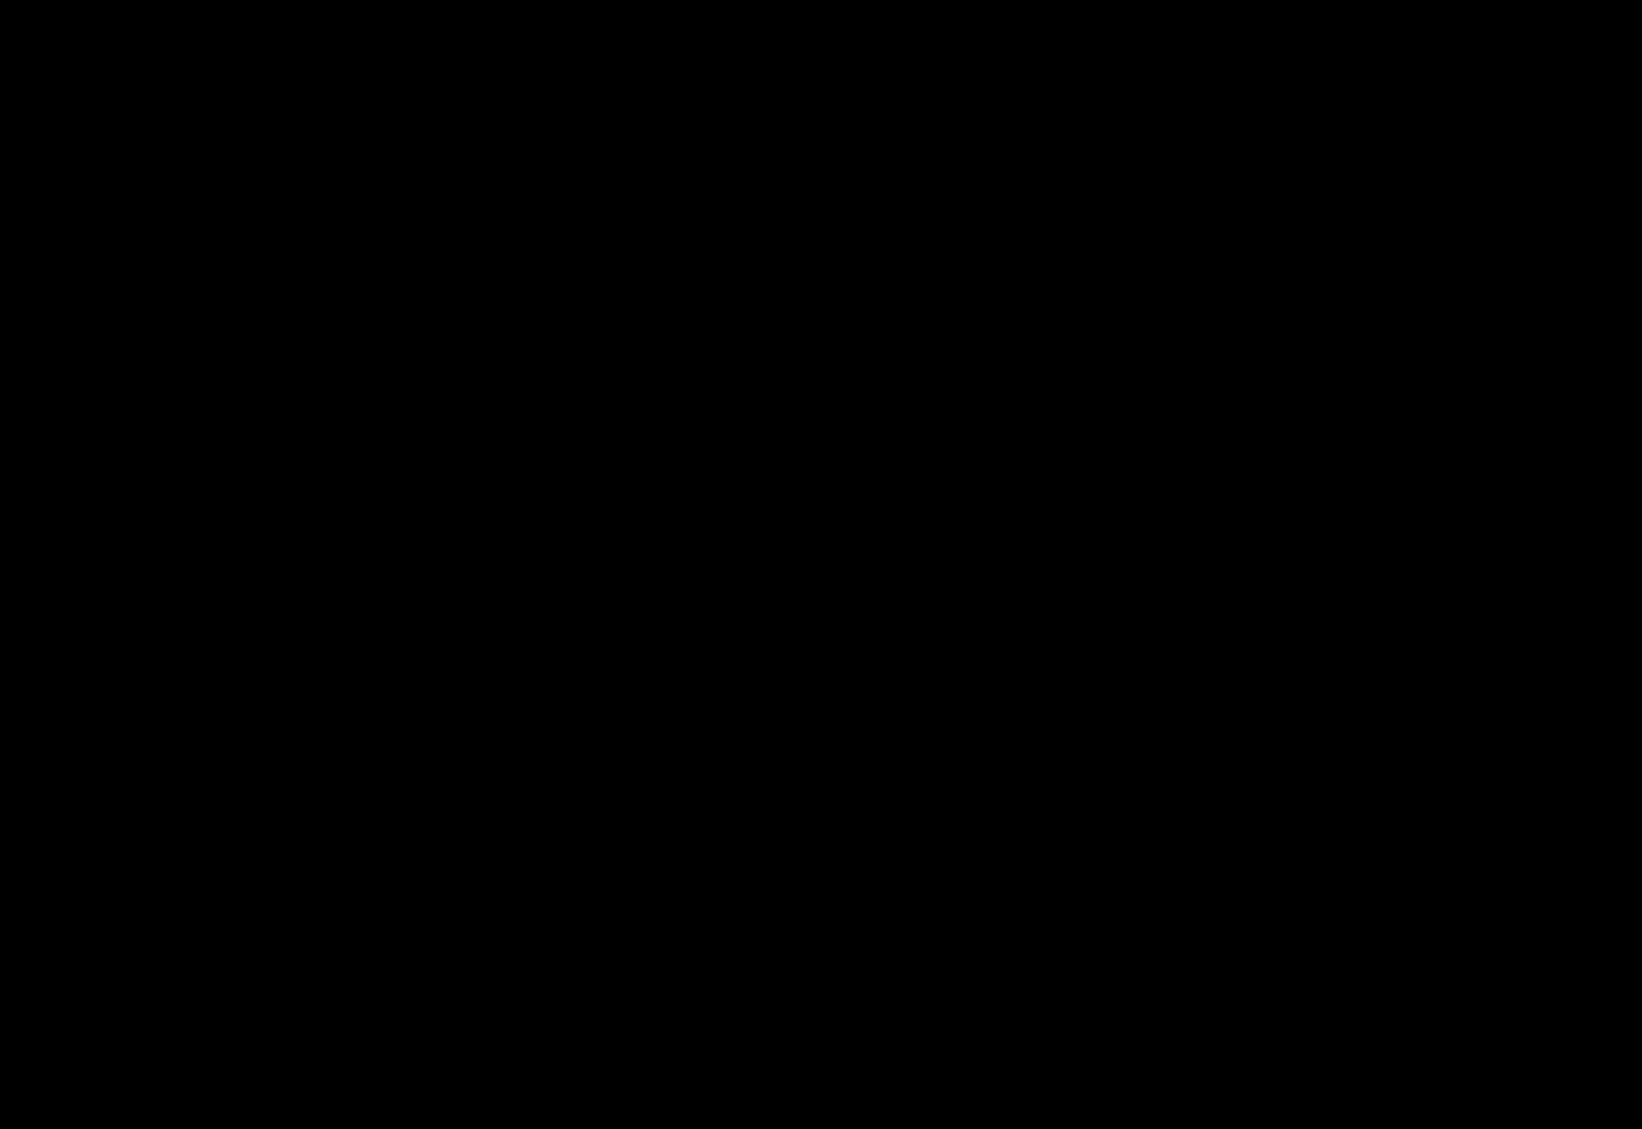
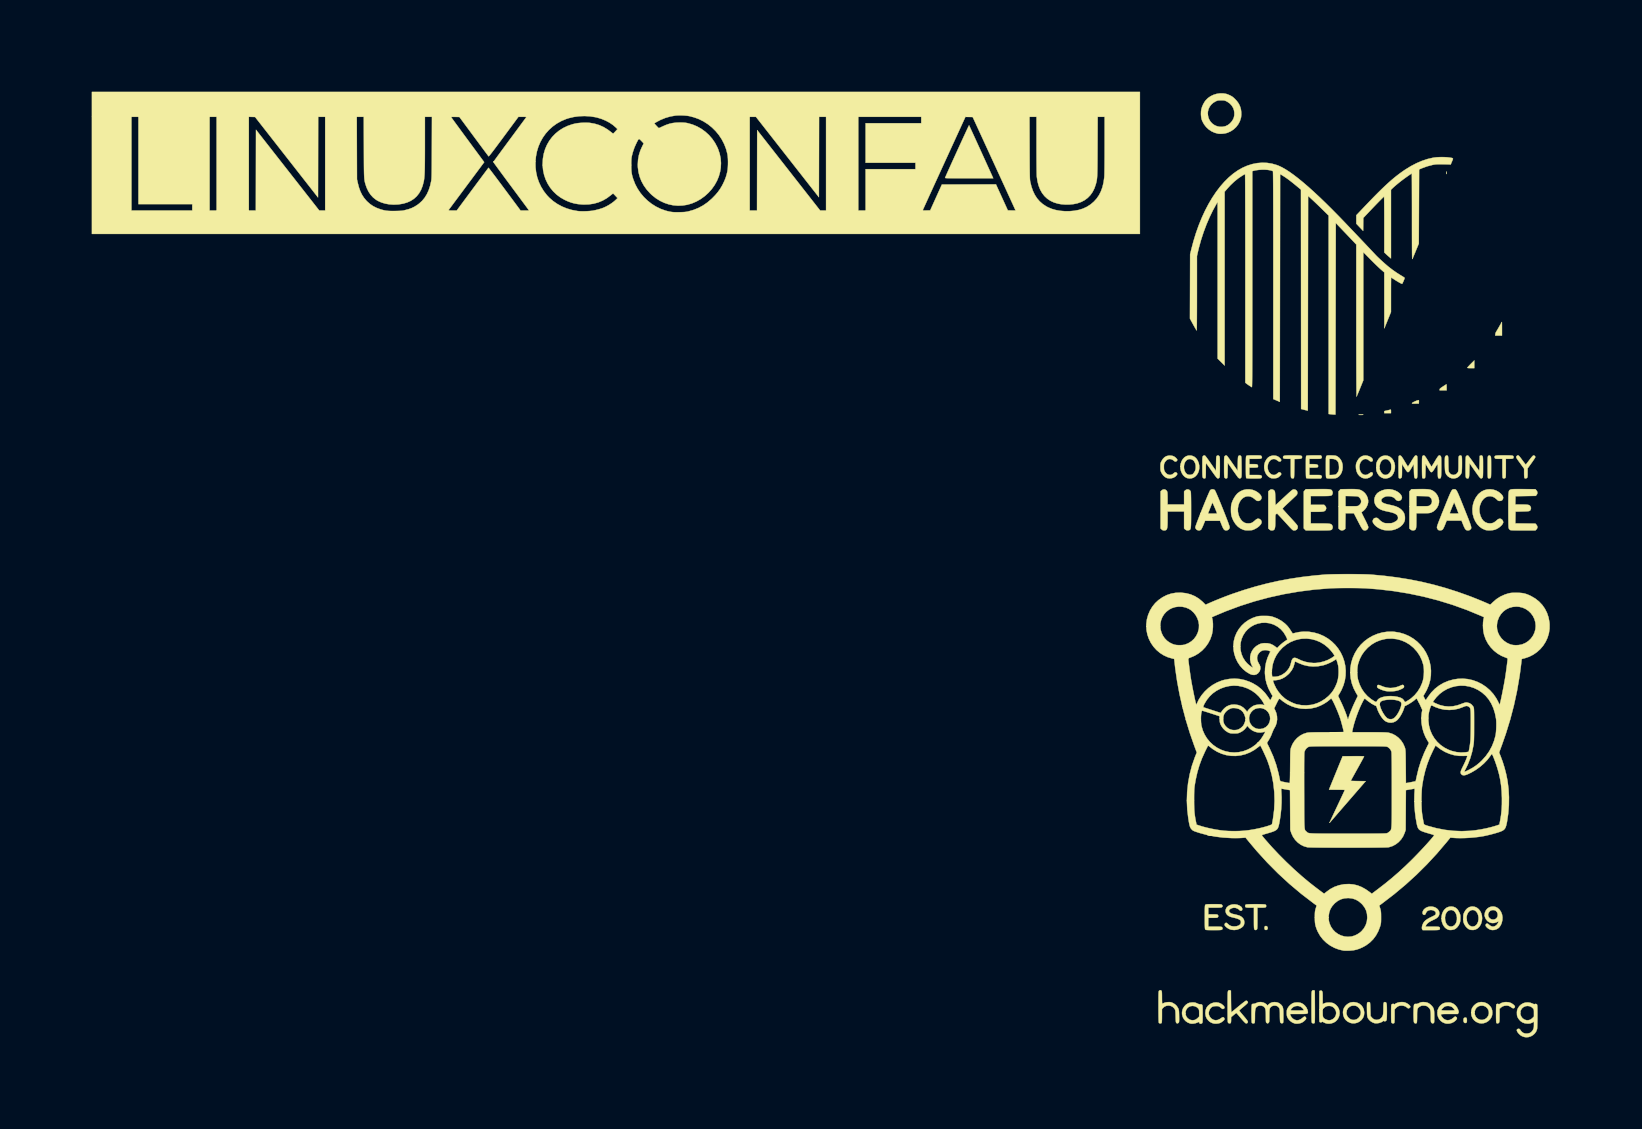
drawing: none -> [91, 91, 1141, 235]
drawing: none -> [1146, 93, 1550, 1038]

